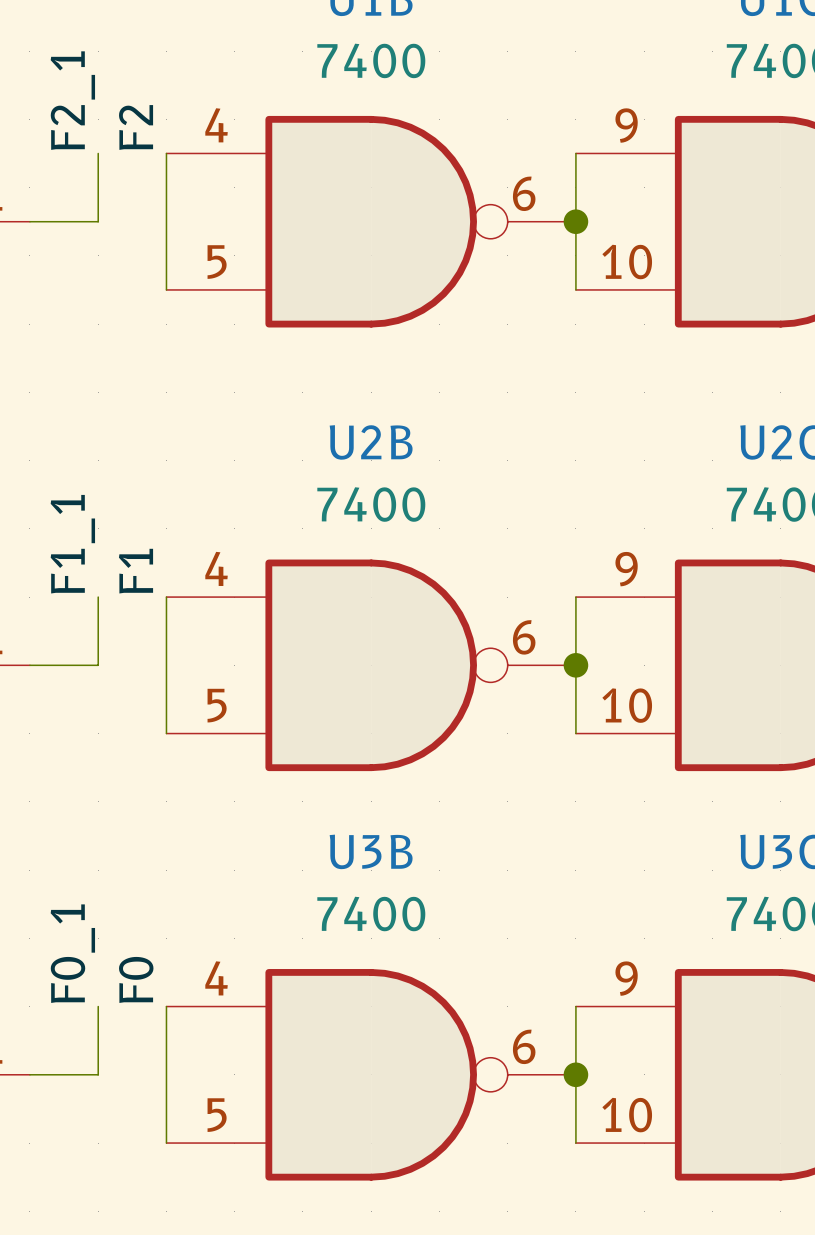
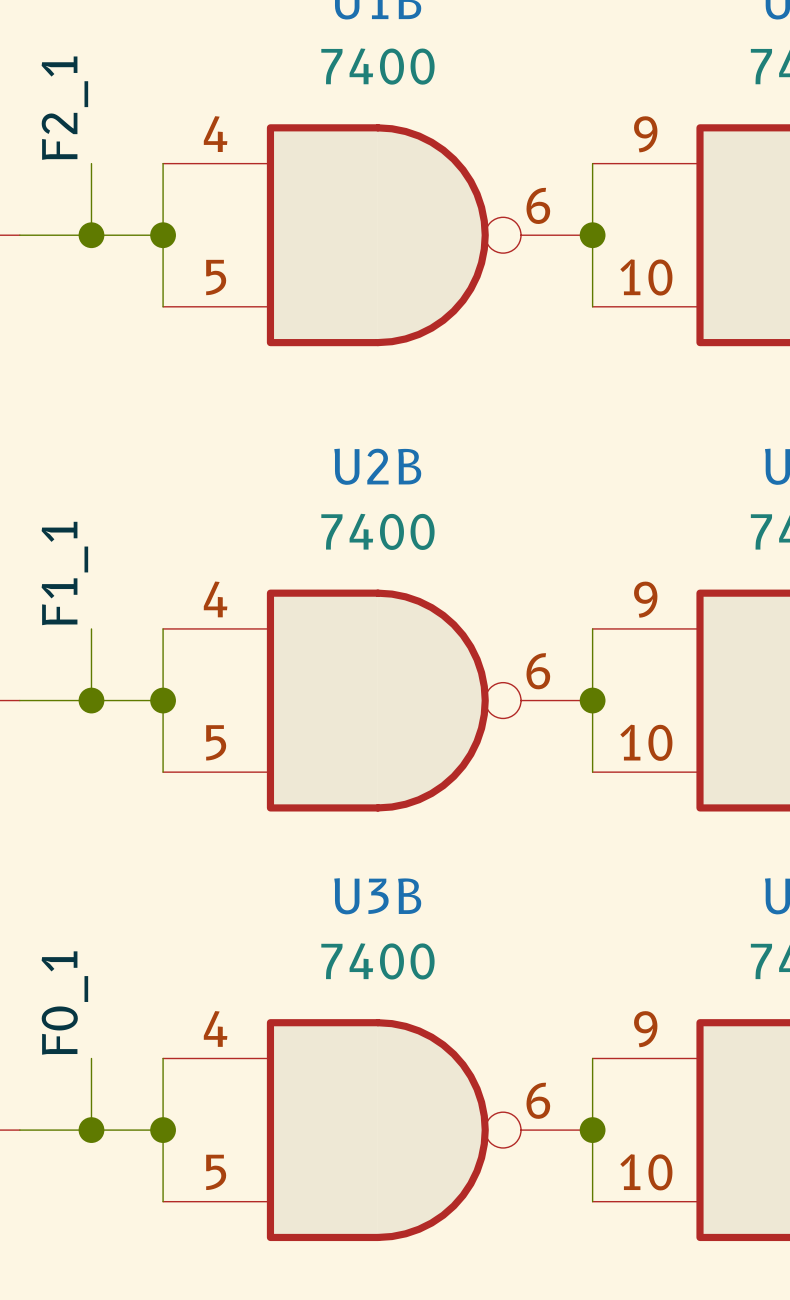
label: F2 (136, 127) -> none
wire: none -> (91, 235) (163, 235)
junction: none -> (91, 235)
junction: none -> (163, 235)
label: F1 (136, 571) -> none
wire: none -> (91, 700) (163, 700)
junction: none -> (91, 700)
junction: none -> (163, 700)
label: F0 (136, 979) -> none
wire: none -> (91, 1130) (163, 1130)
junction: none -> (91, 1130)
junction: none -> (163, 1130)

